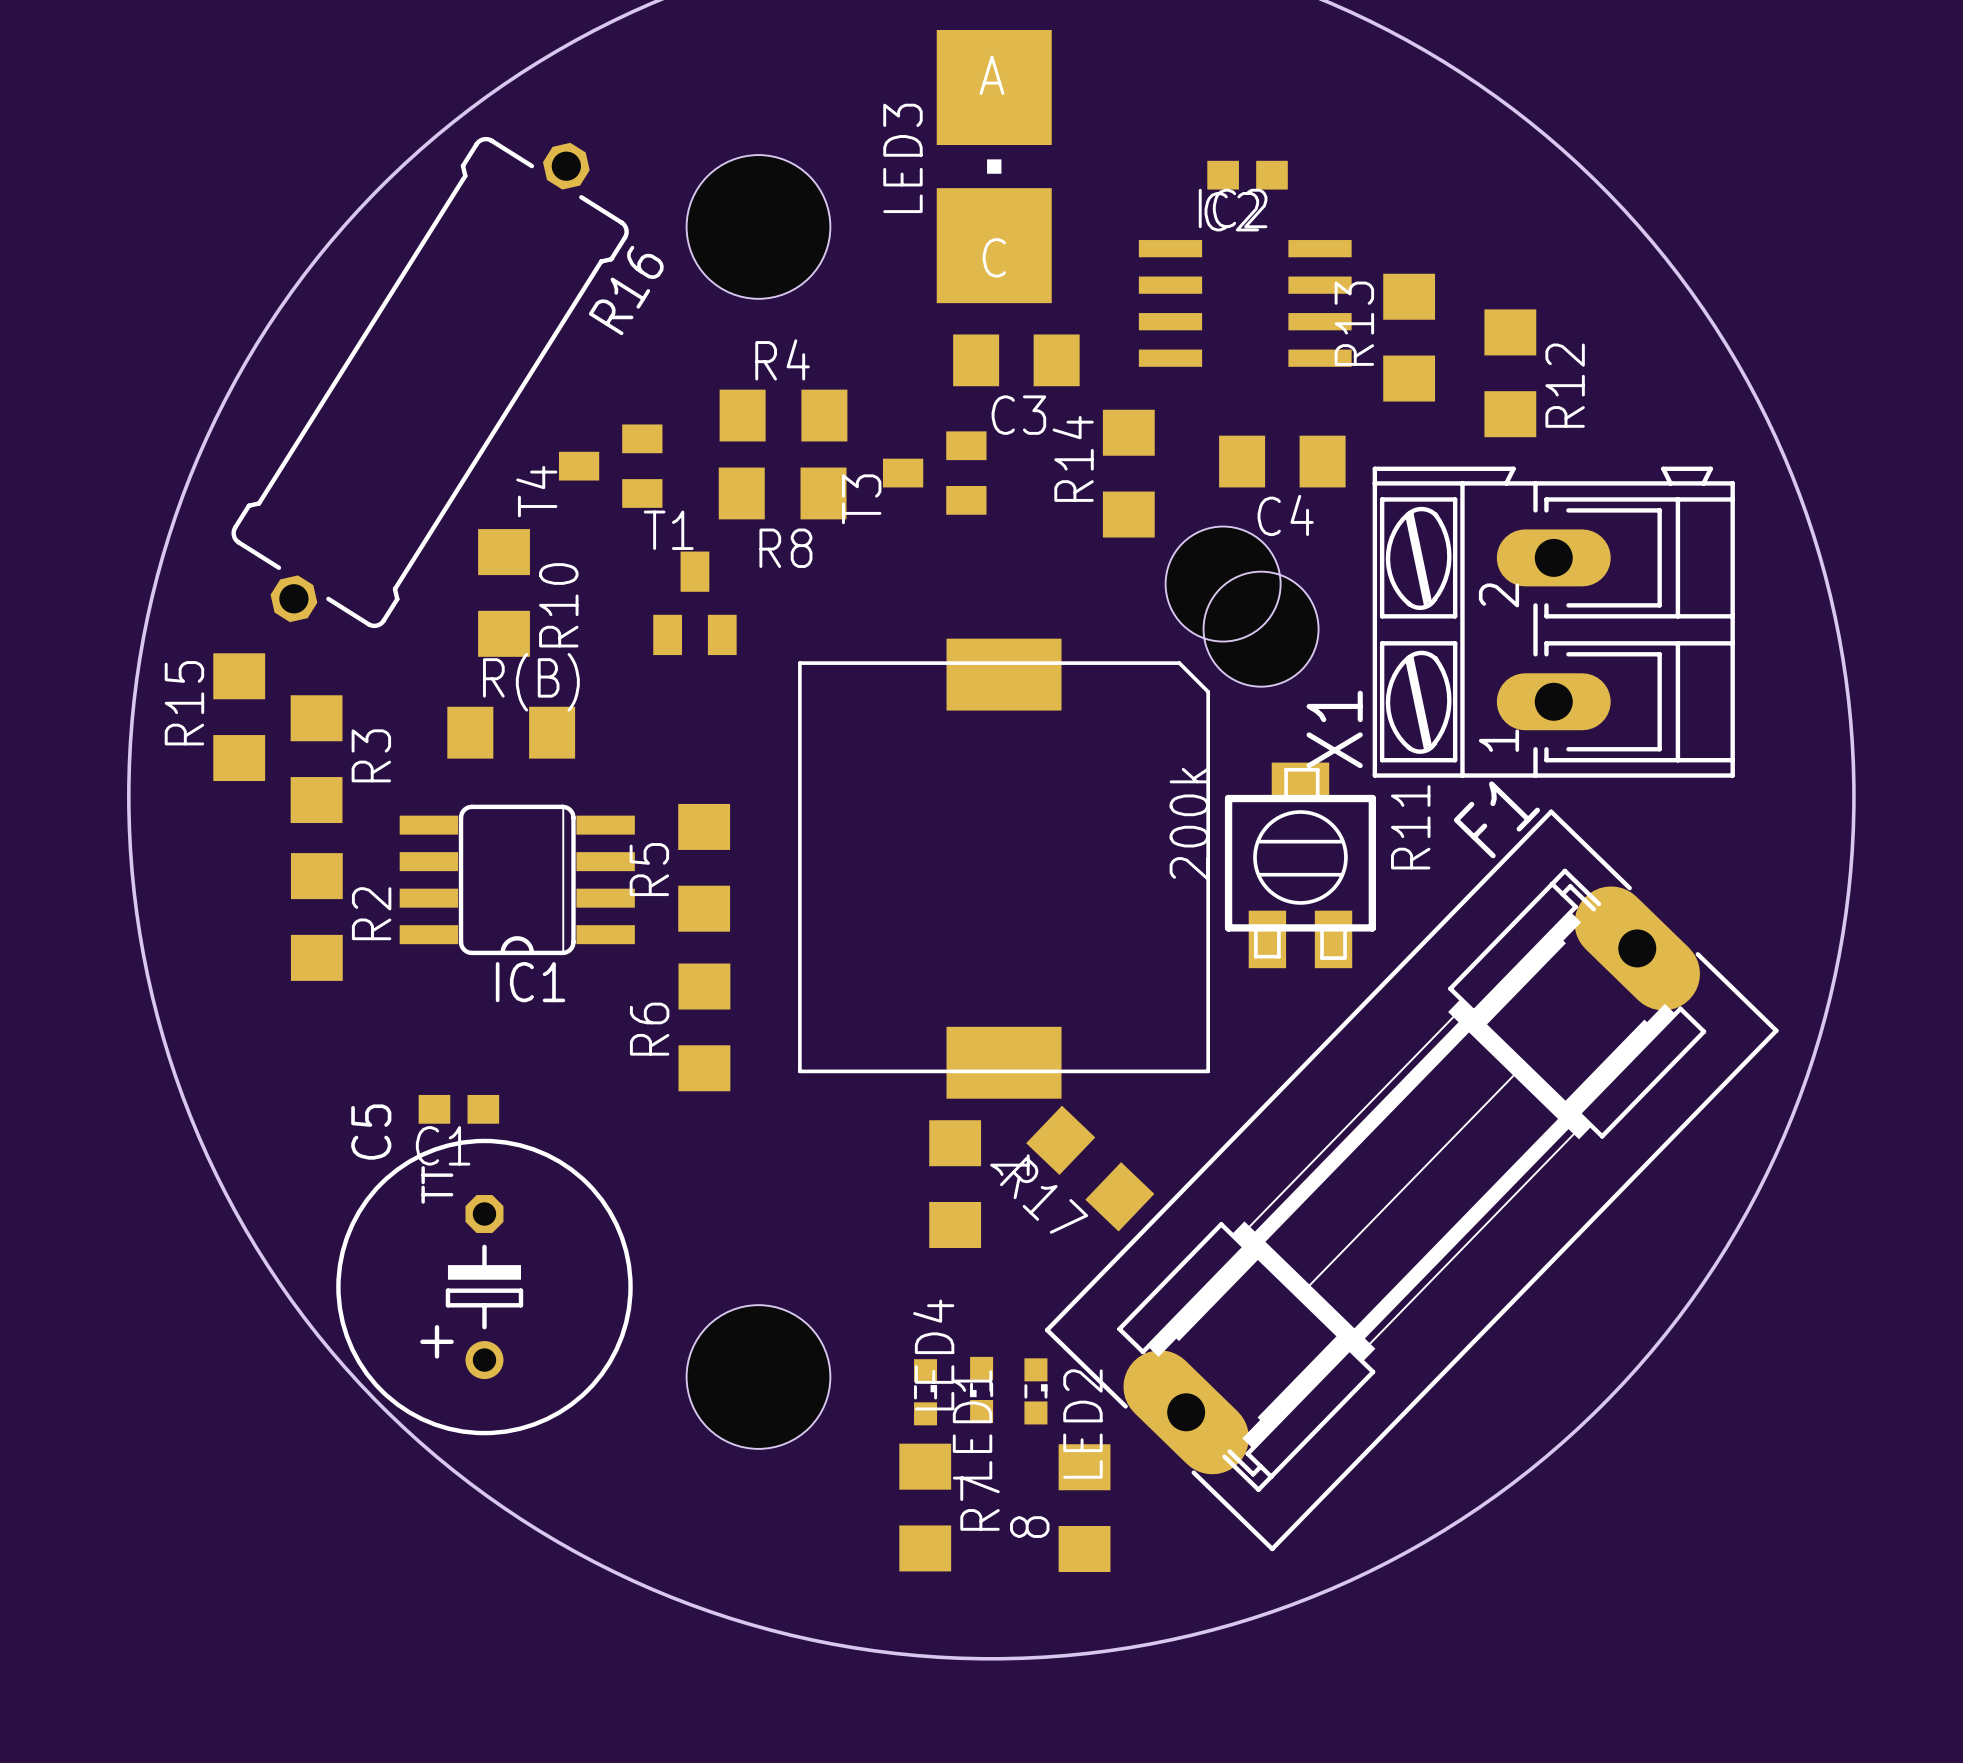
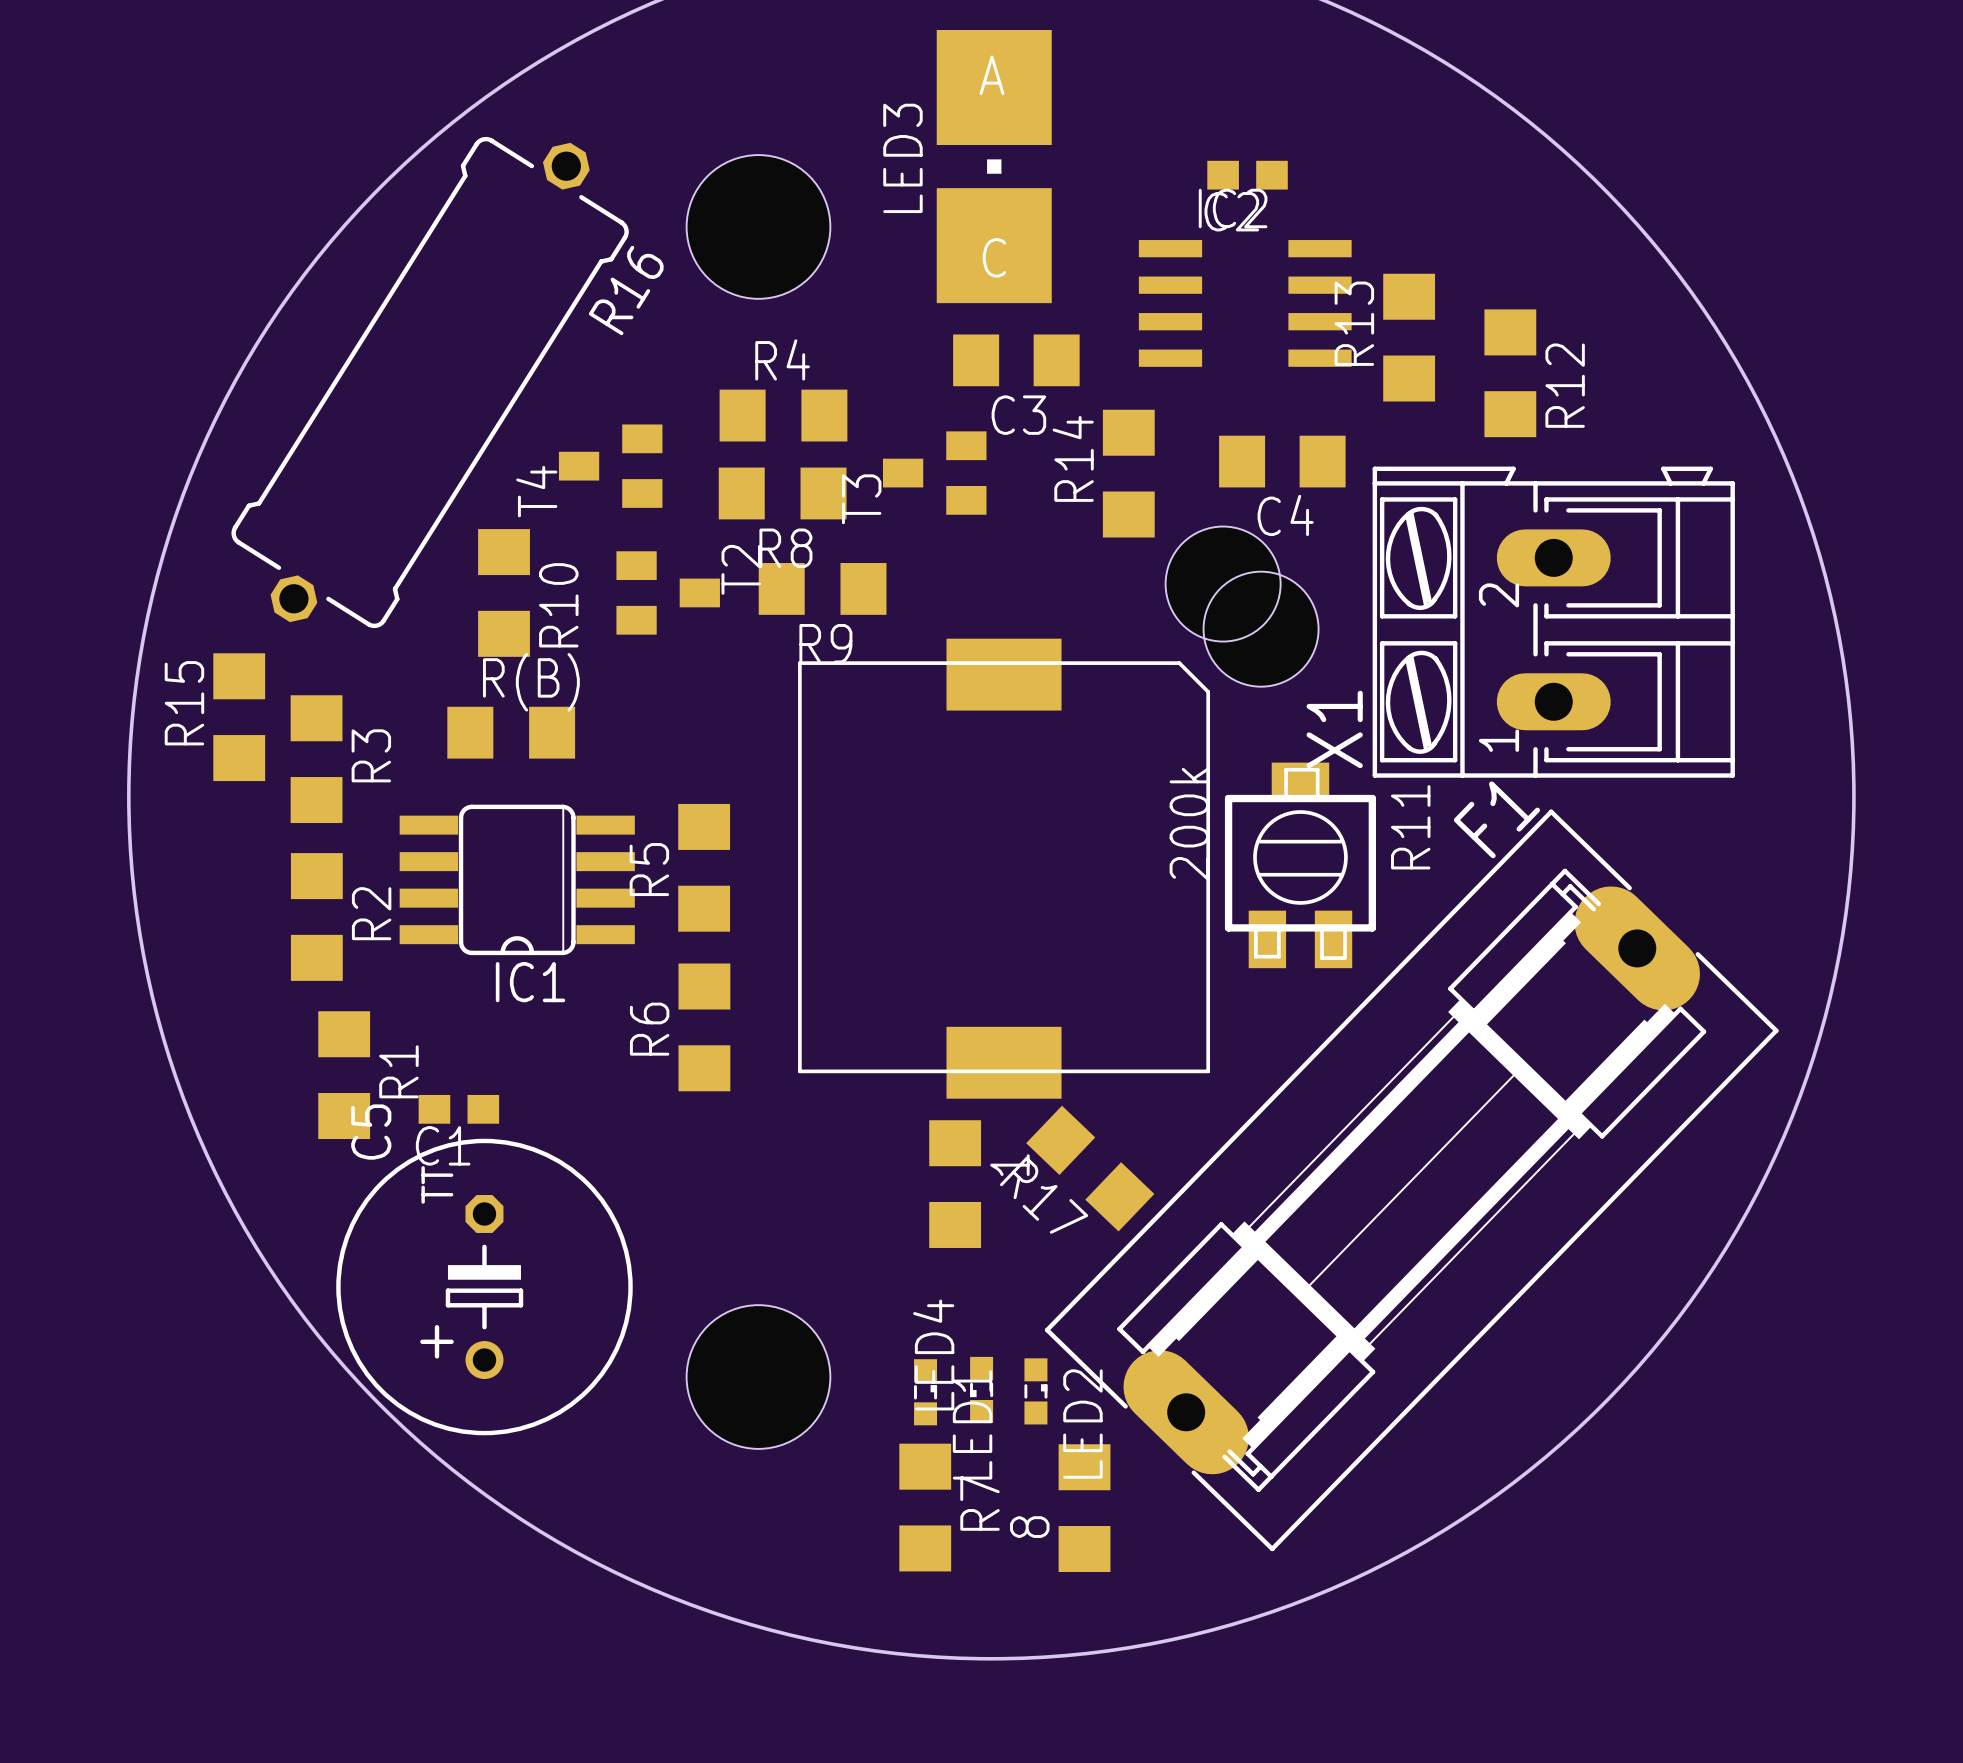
R9: none -> (822, 588)
T2: none -> (668, 592)
T1: (694, 603) -> none
R1: none -> (344, 1075)

